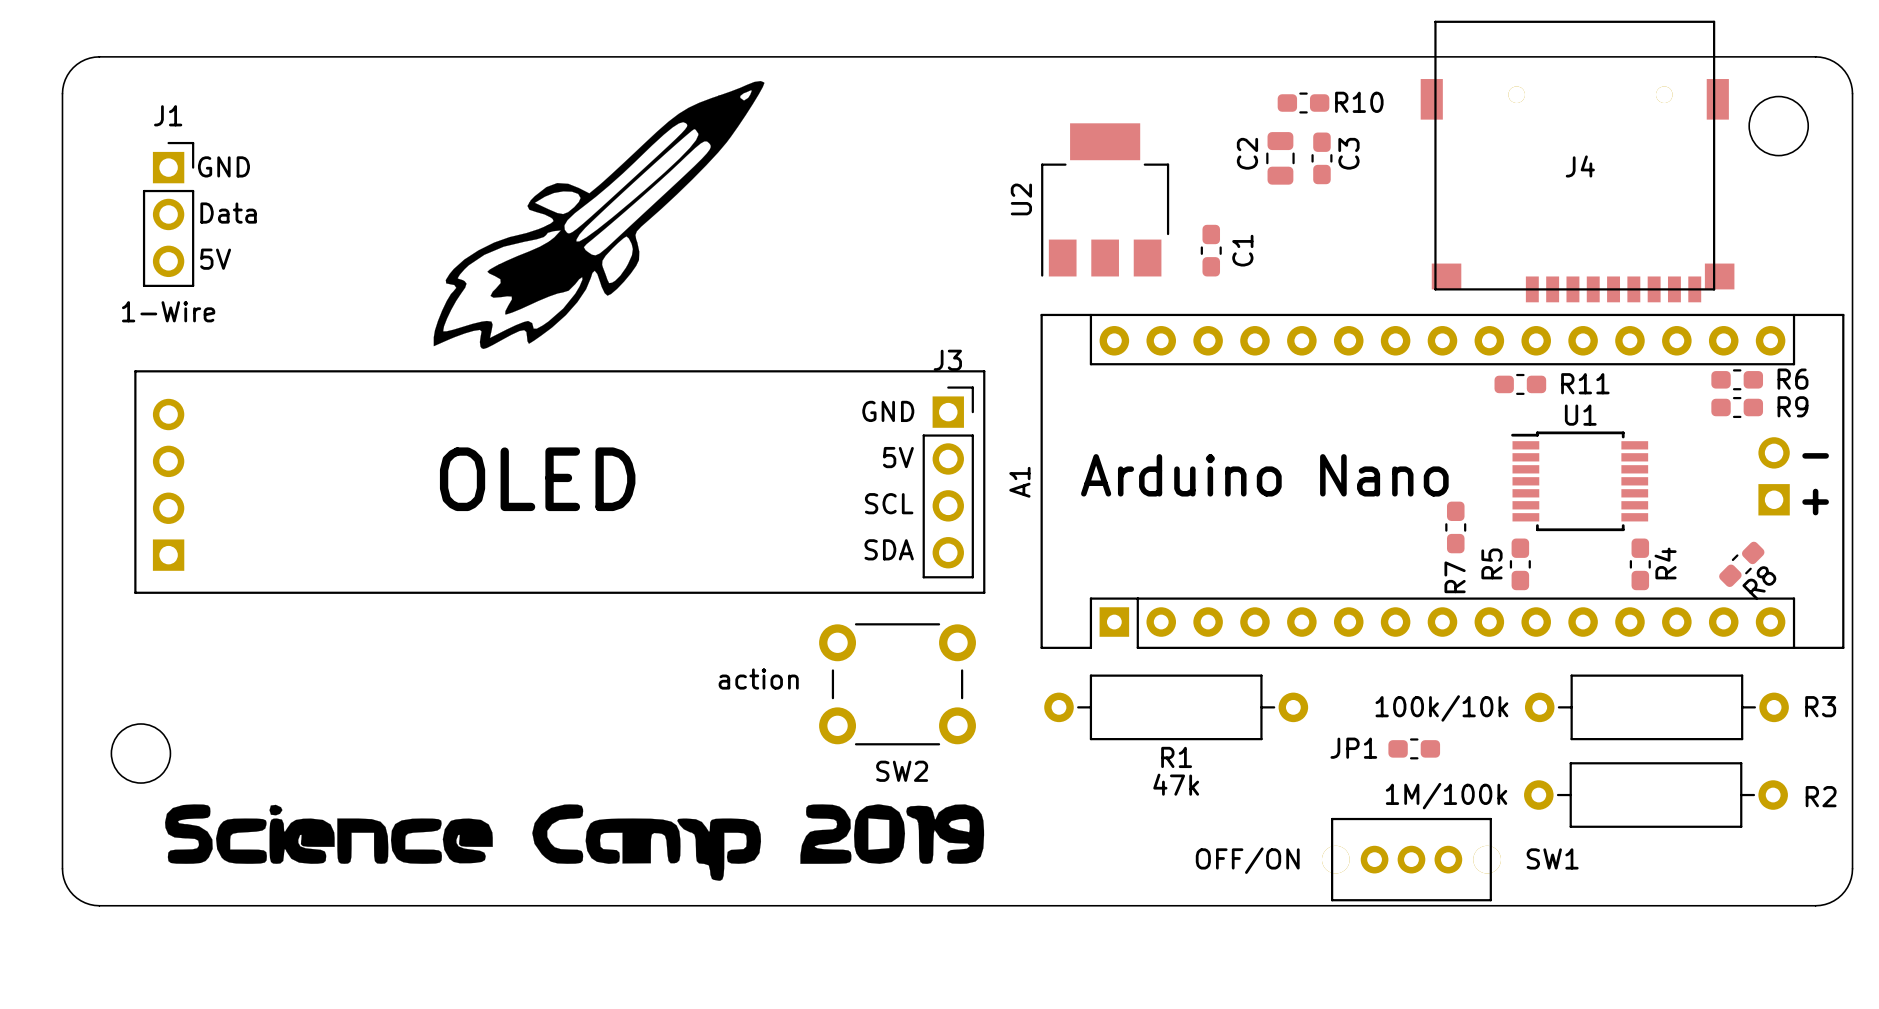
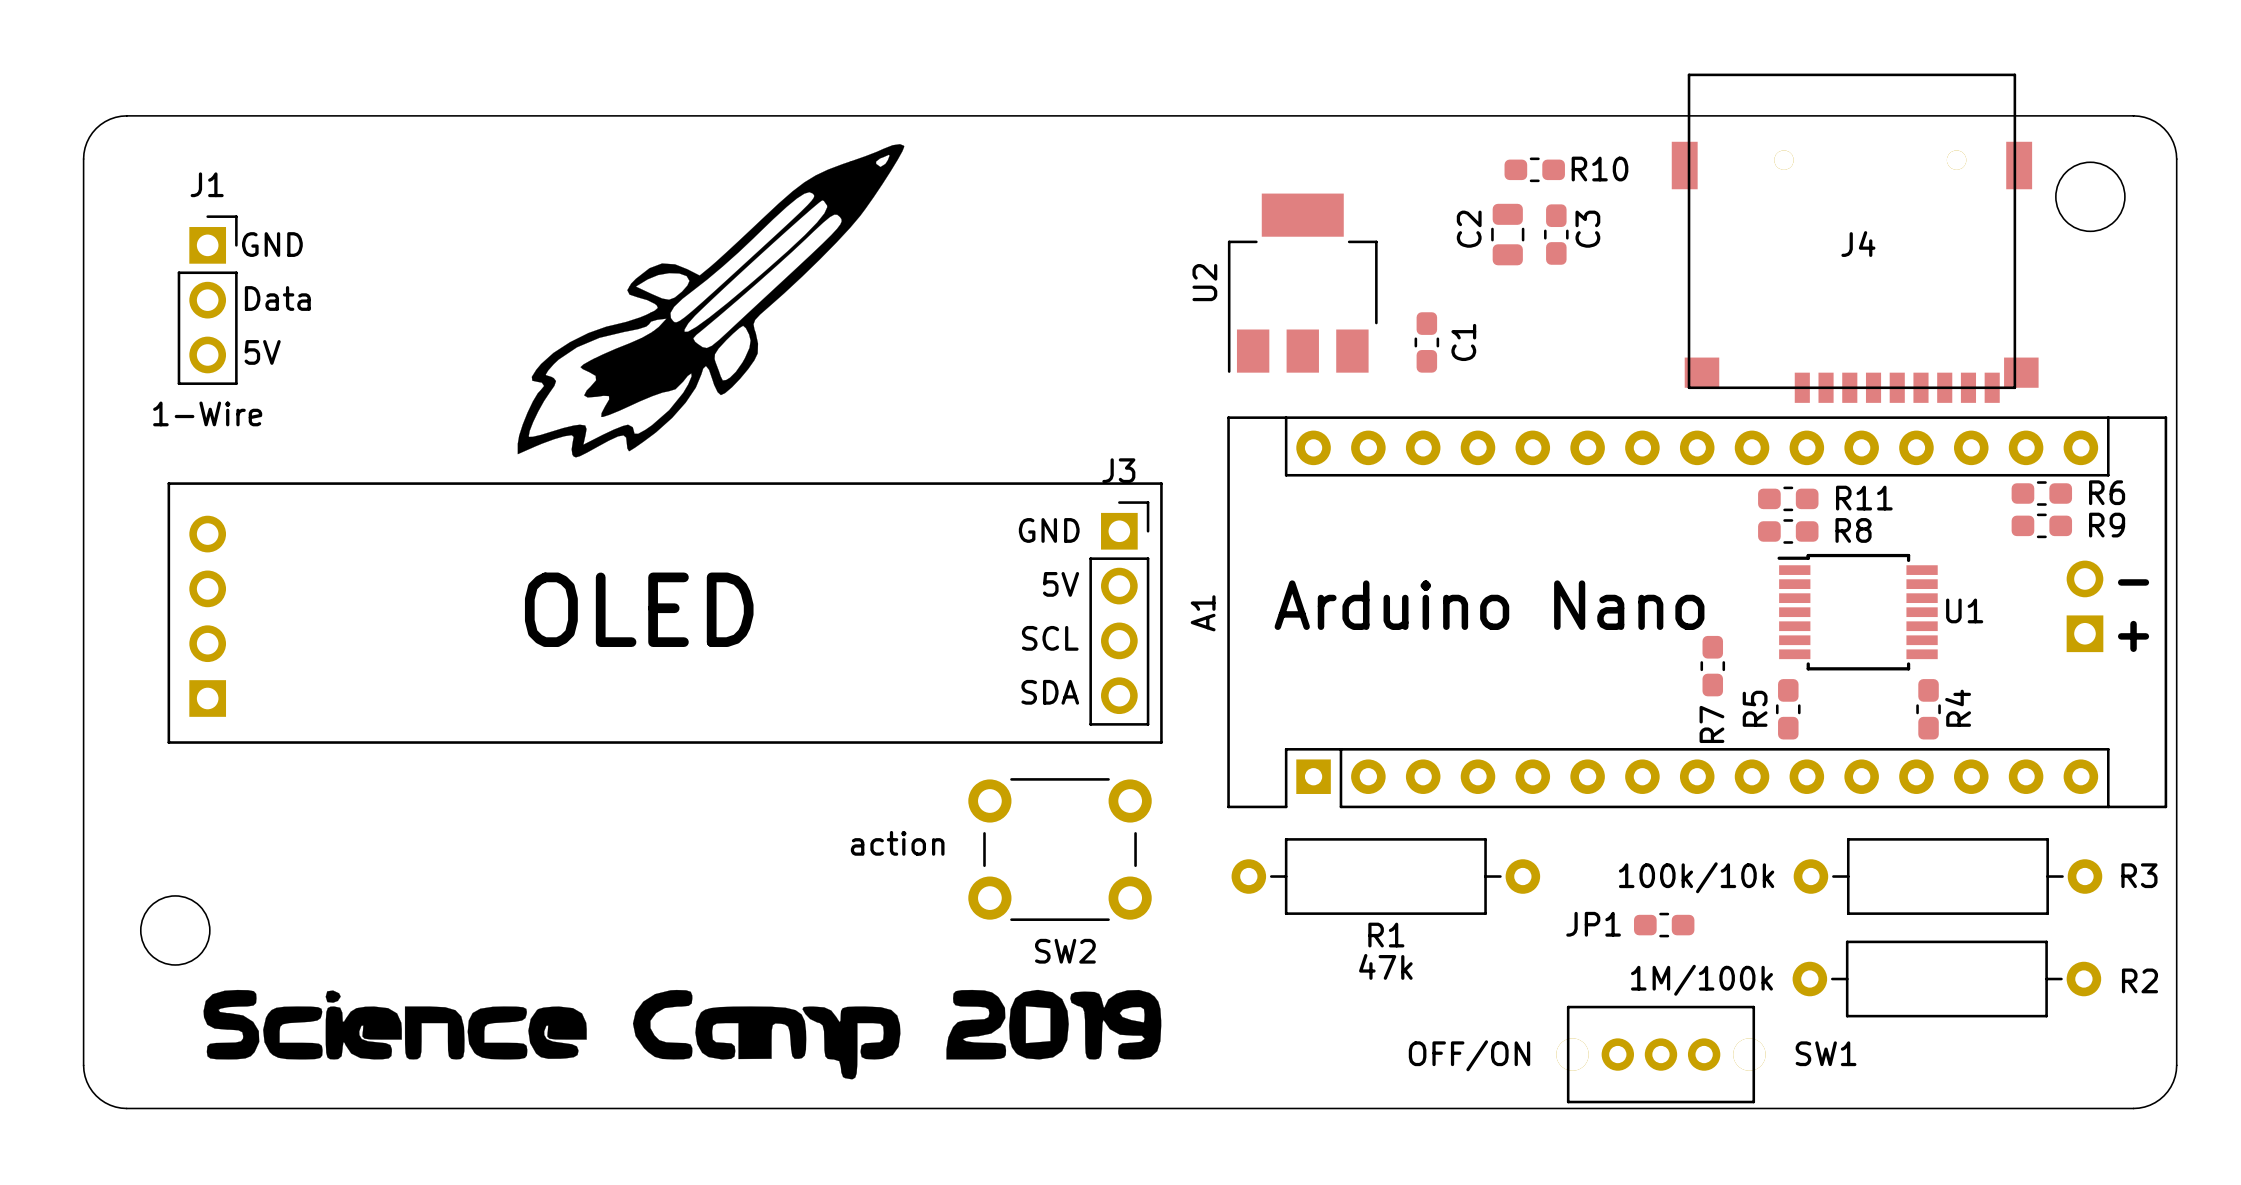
U1 name position: U1 (1580, 415) -> U1 (1964, 610)
R8 rotation: 0° (1741, 564) -> 45° clockwise (1788, 531)
R8 position: (1741, 564) -> (1788, 531)
R8 name position: R8 (1759, 583) -> R8 (1853, 530)

